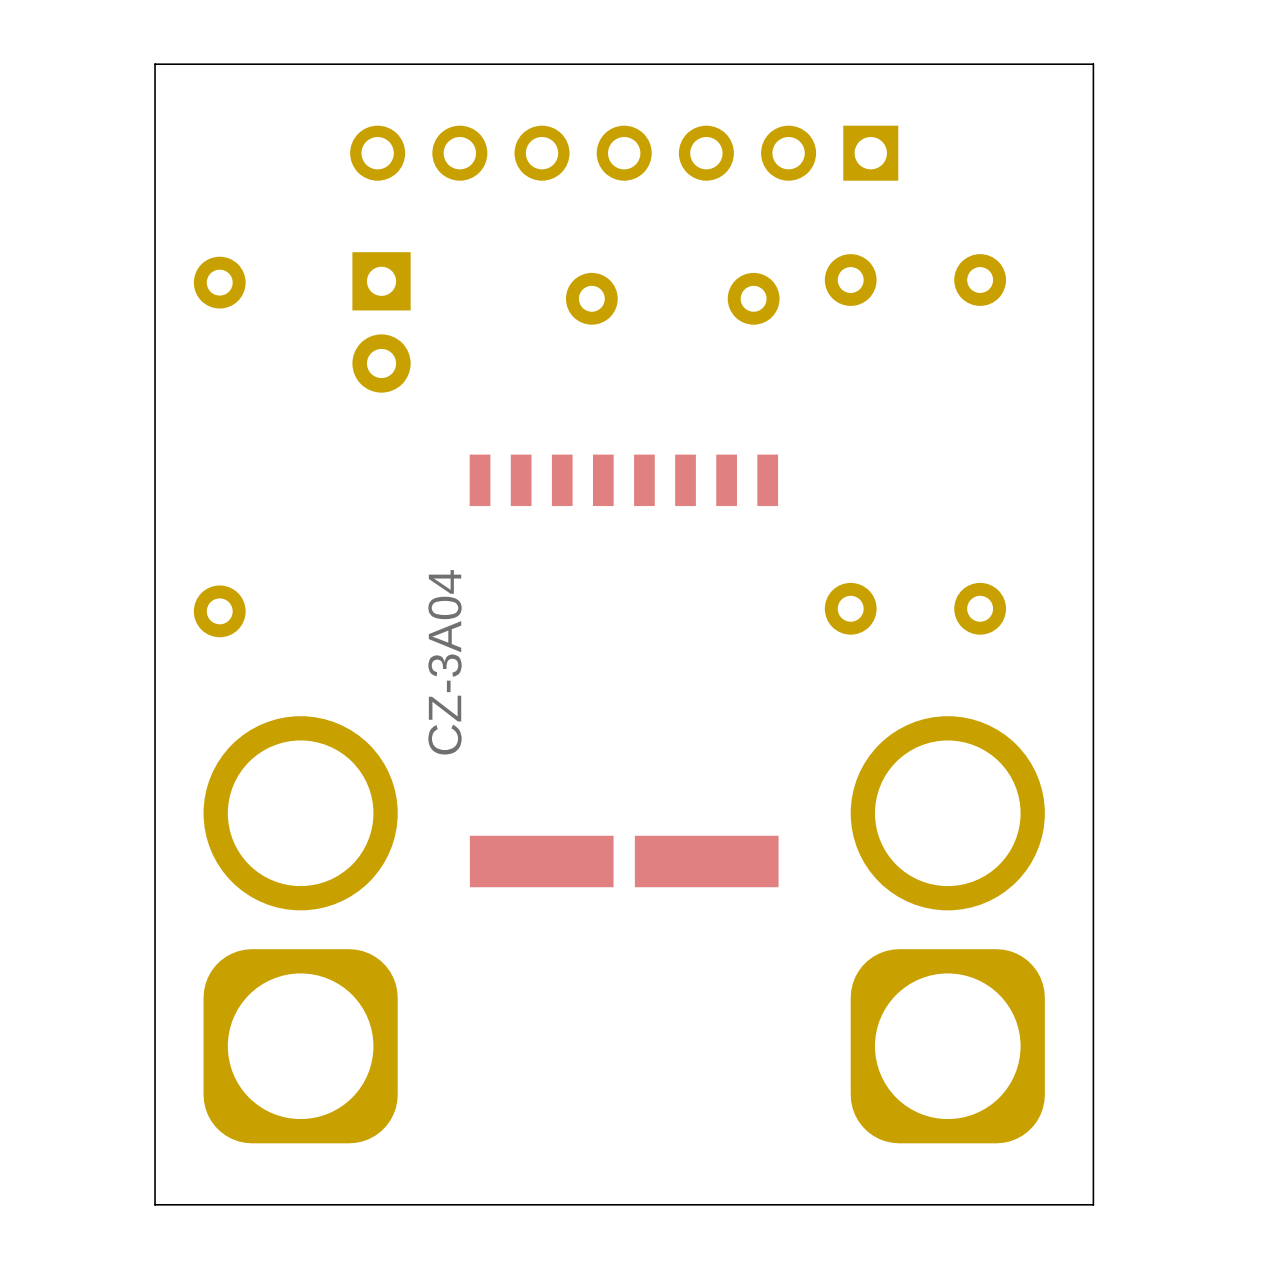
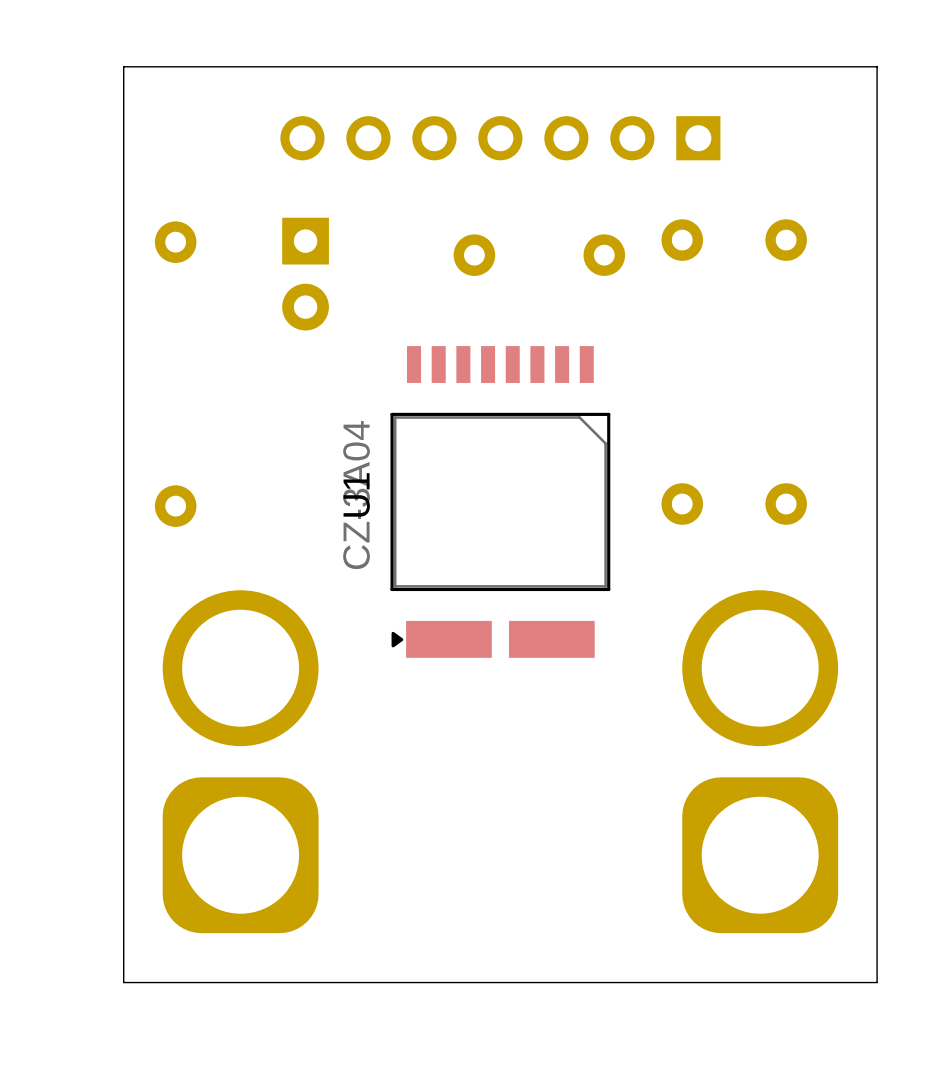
U1: none -> CZ-3A04 (500, 501)
part: CZ-3A04 (624, 670) -> none

